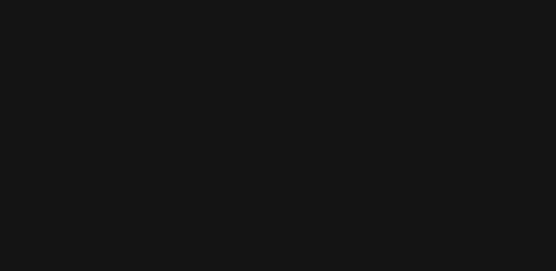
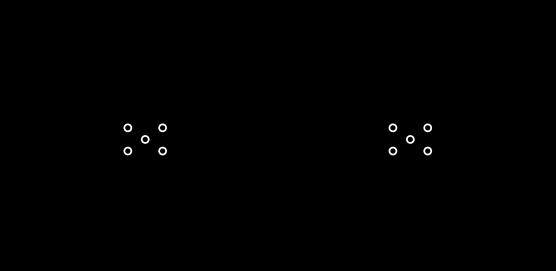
part: none -> (145, 139)
part: none -> (410, 139)

